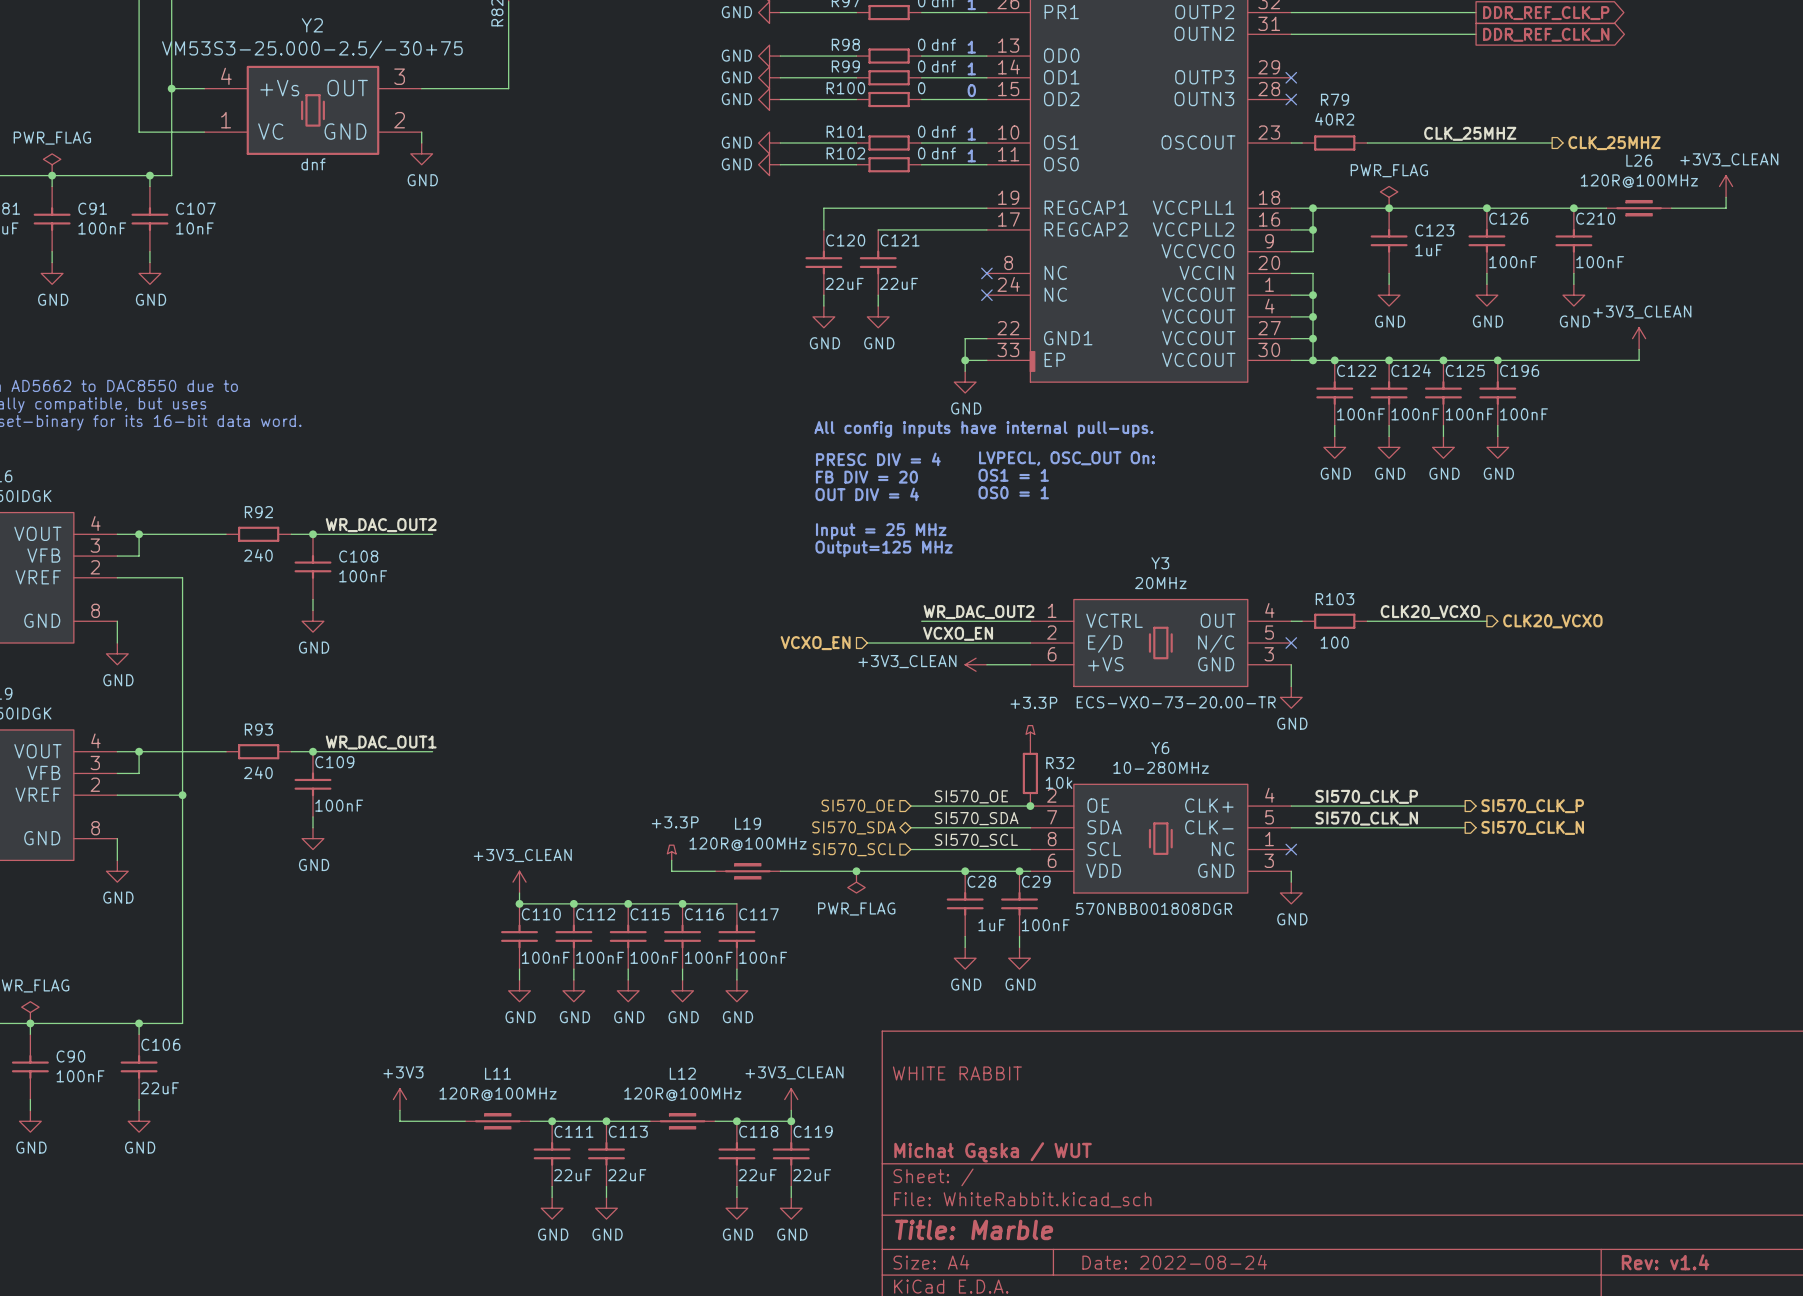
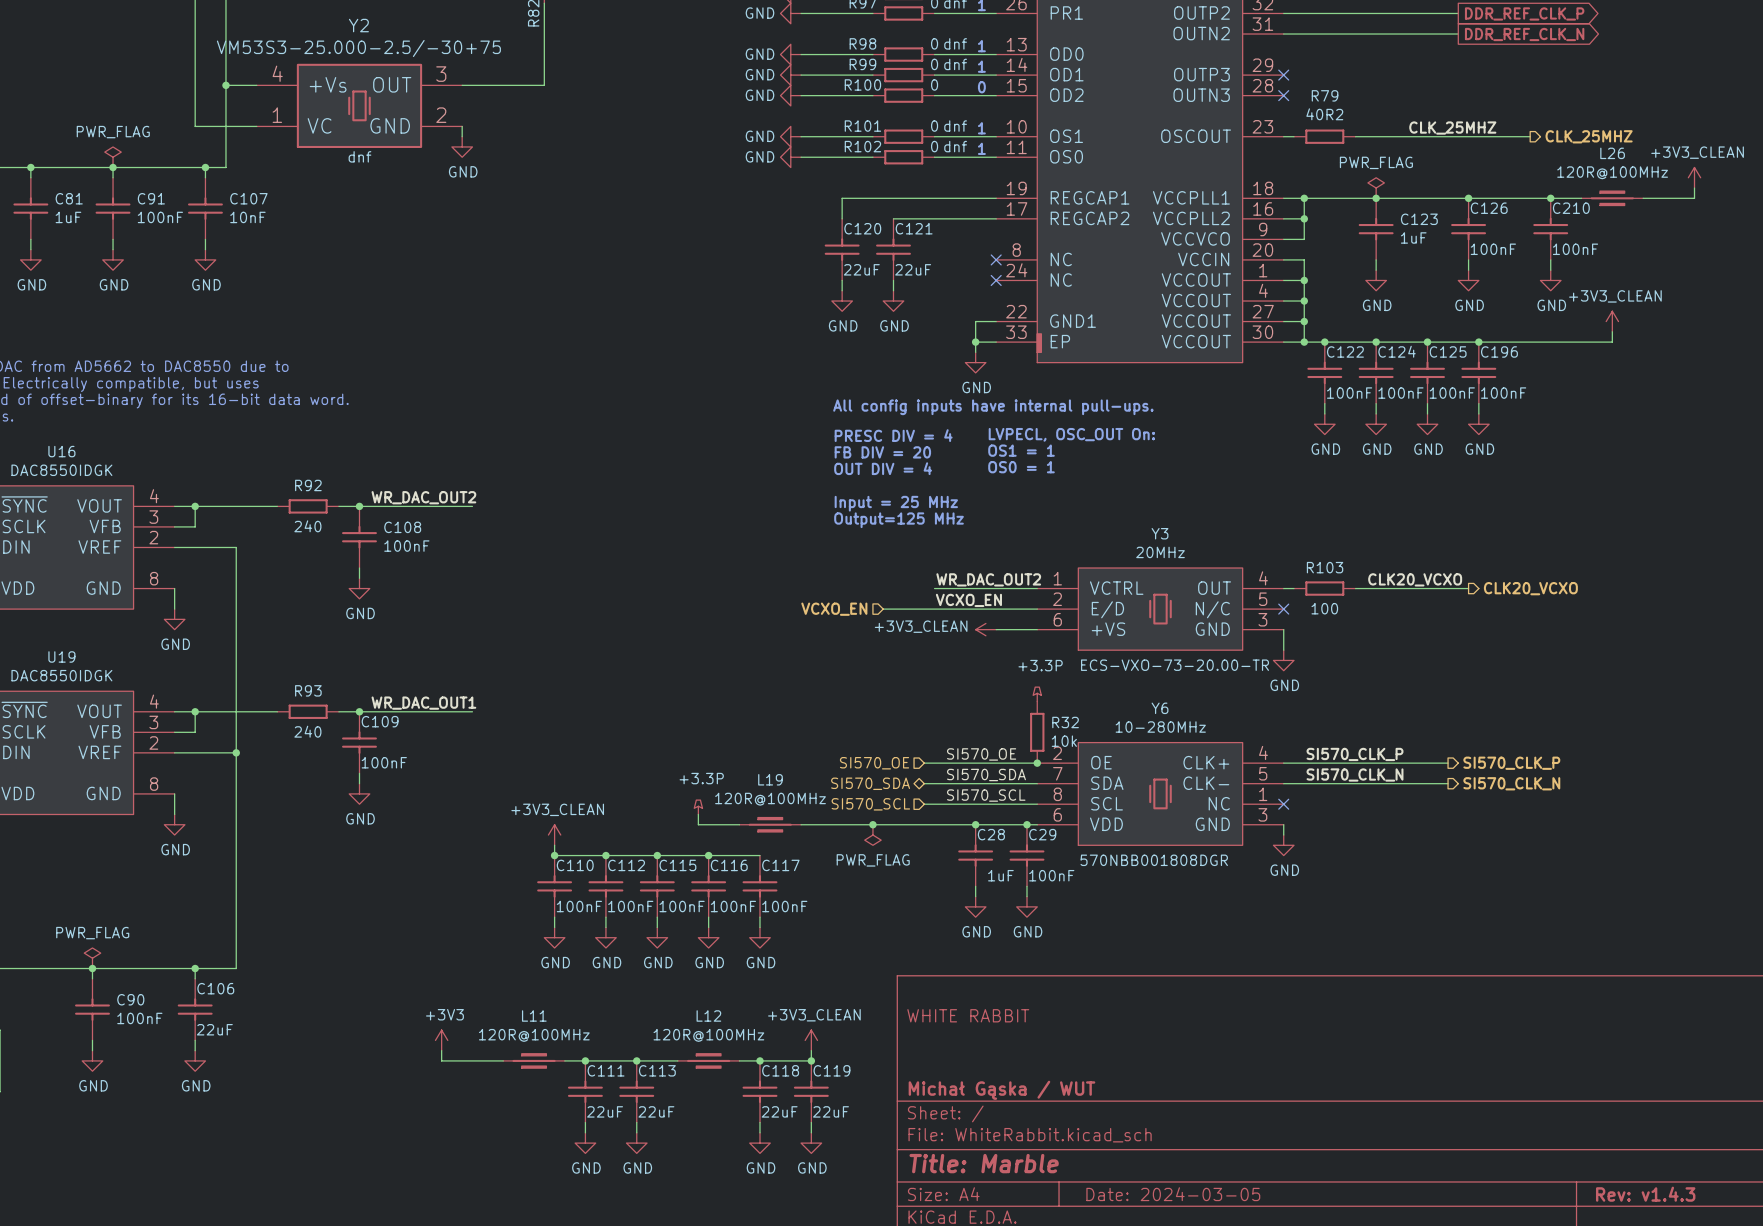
title block: Date: 2022-08-24 (1174, 1262) -> Date: 2024-03-05 (1173, 1194)
title block: Rev: v1.4 (1665, 1262) -> Rev: v1.4.3 (1645, 1194)

